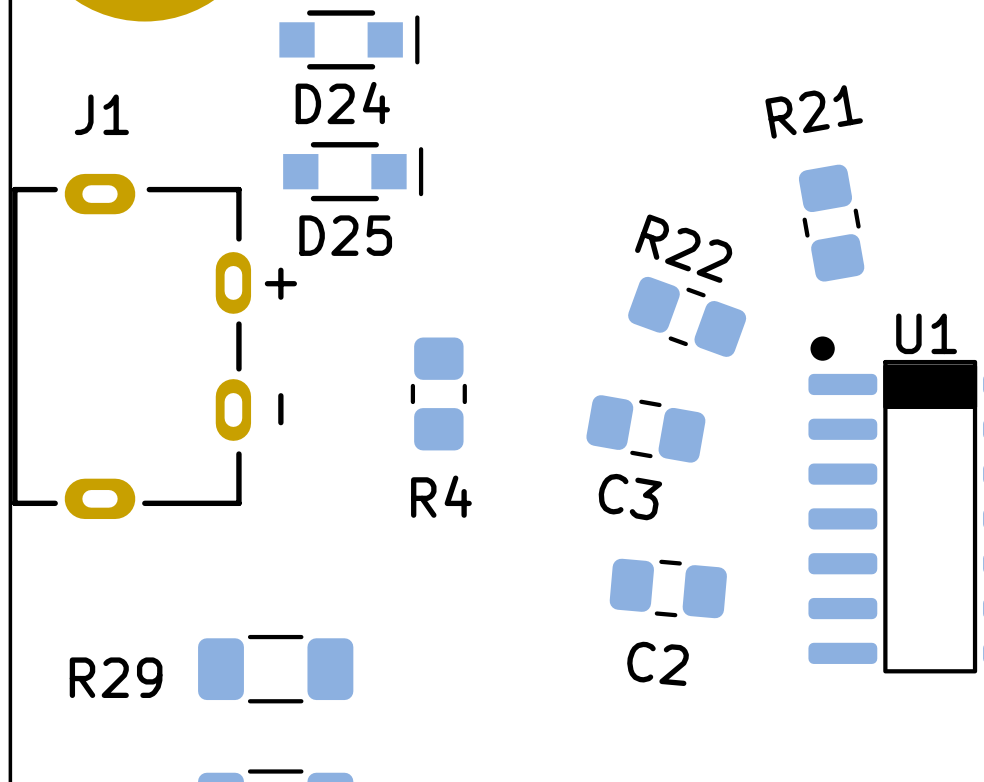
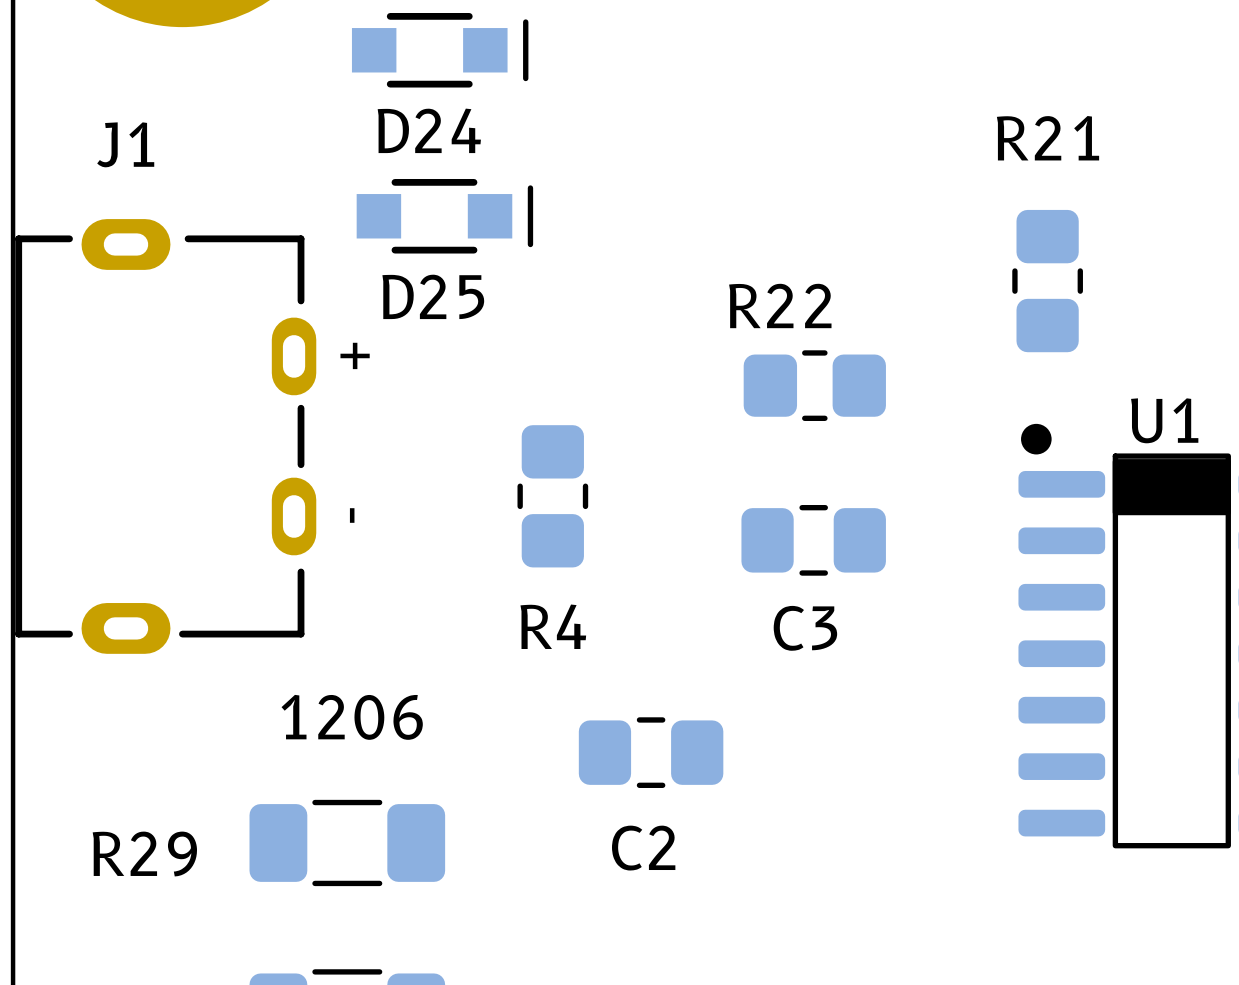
R21 rotation: 0° (831, 223) -> 10° clockwise (1047, 281)
R22 rotation: 0° (687, 316) -> 20° counterclockwise (814, 385)
C3 rotation: 0° (645, 428) -> 10° counterclockwise (813, 540)
text: none -> 1206 (352, 717)
C2 rotation: 0° (668, 588) -> 5° counterclockwise (651, 752)
C2 position: (668, 588) -> (651, 752)

